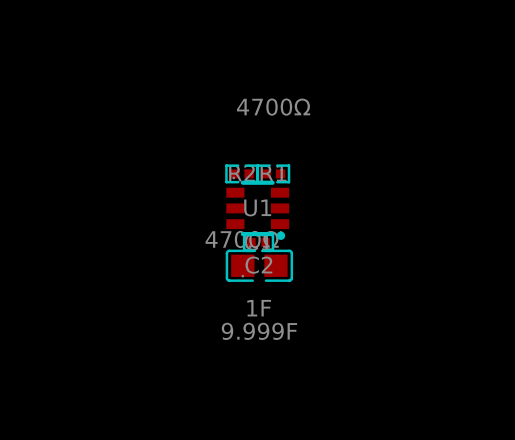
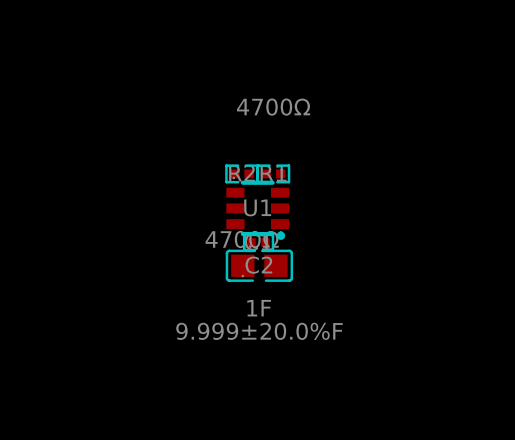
C2 value: 9.999F (259, 331) -> 9.999±20.0%F (259, 331)

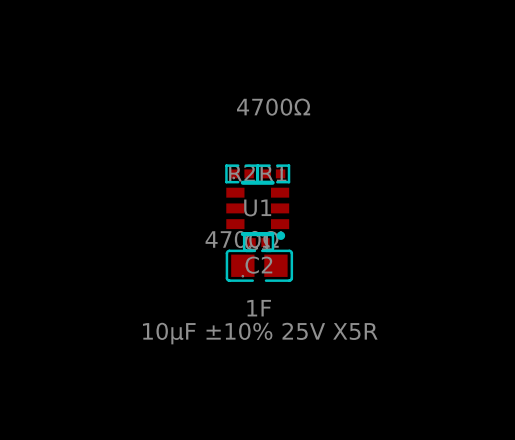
C2 value: 9.999±20.0%F (259, 331) -> 10µF ±10% 25V X5R (260, 333)

